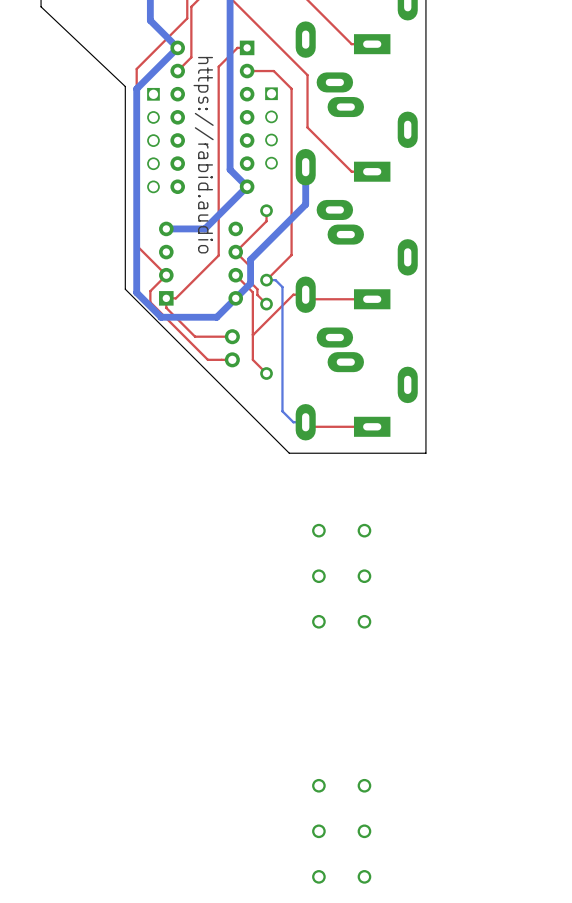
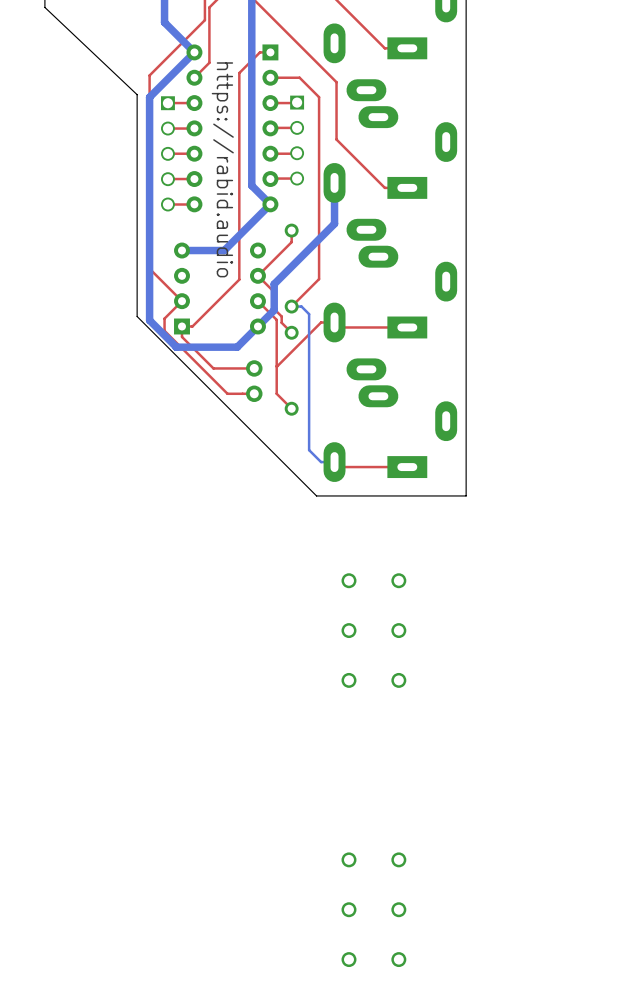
top track: none -> (297, 102) (270, 103)
top track: none -> (194, 103) (167, 103)
top track: none -> (297, 127) (270, 128)
top track: none -> (194, 128) (167, 128)
top track: none -> (194, 153) (167, 153)
top track: none -> (297, 153) (270, 153)
top track: none -> (194, 179) (167, 179)
top track: none -> (297, 178) (270, 179)
top track: none -> (194, 204) (167, 204)

